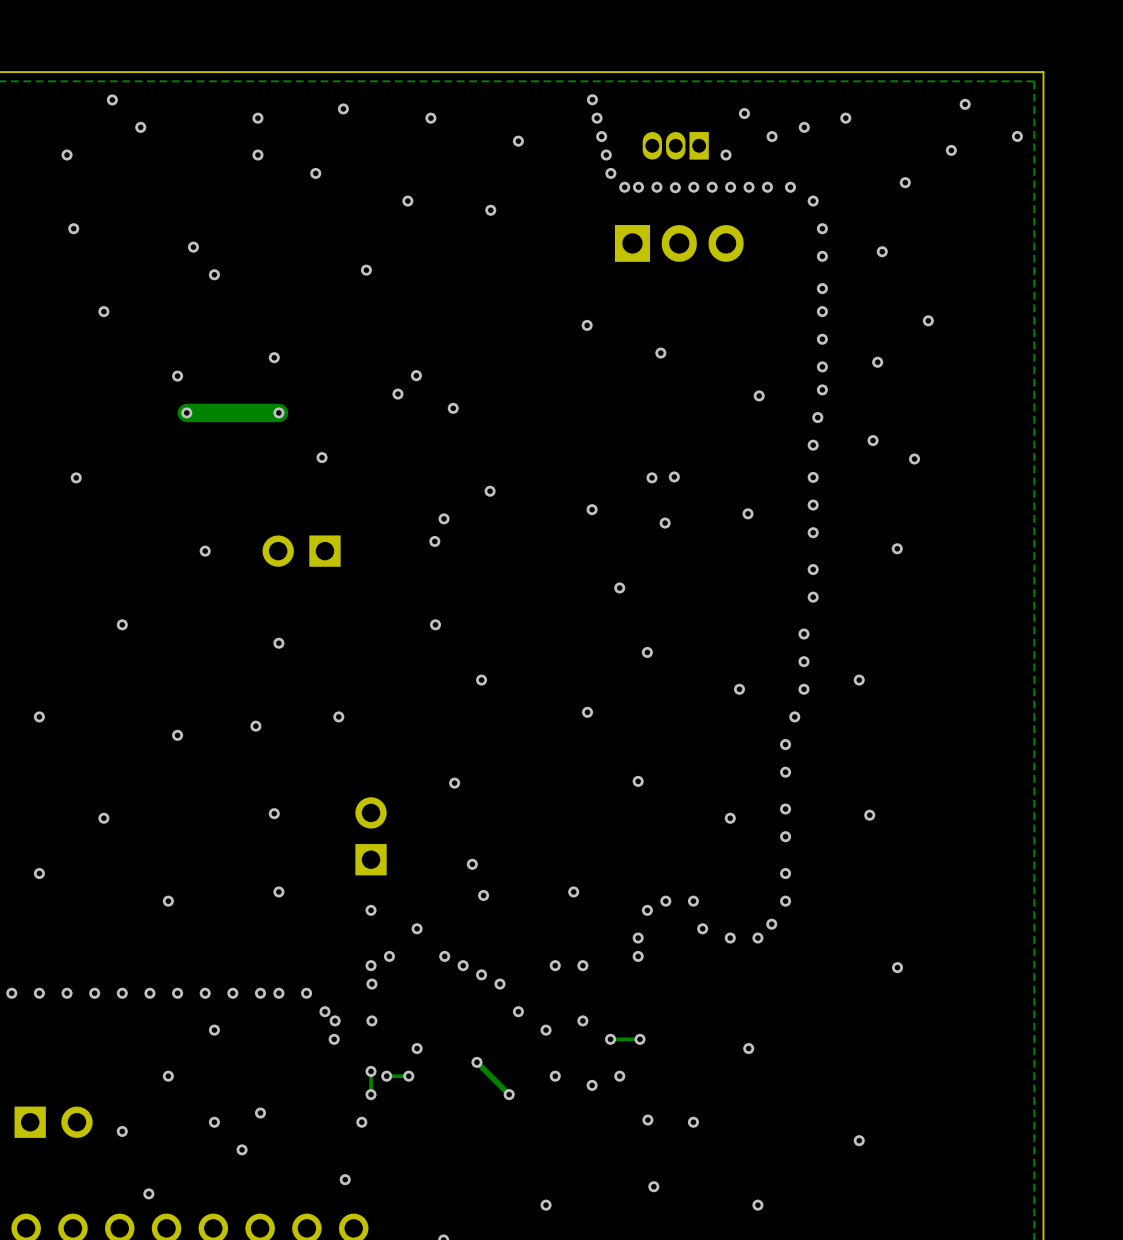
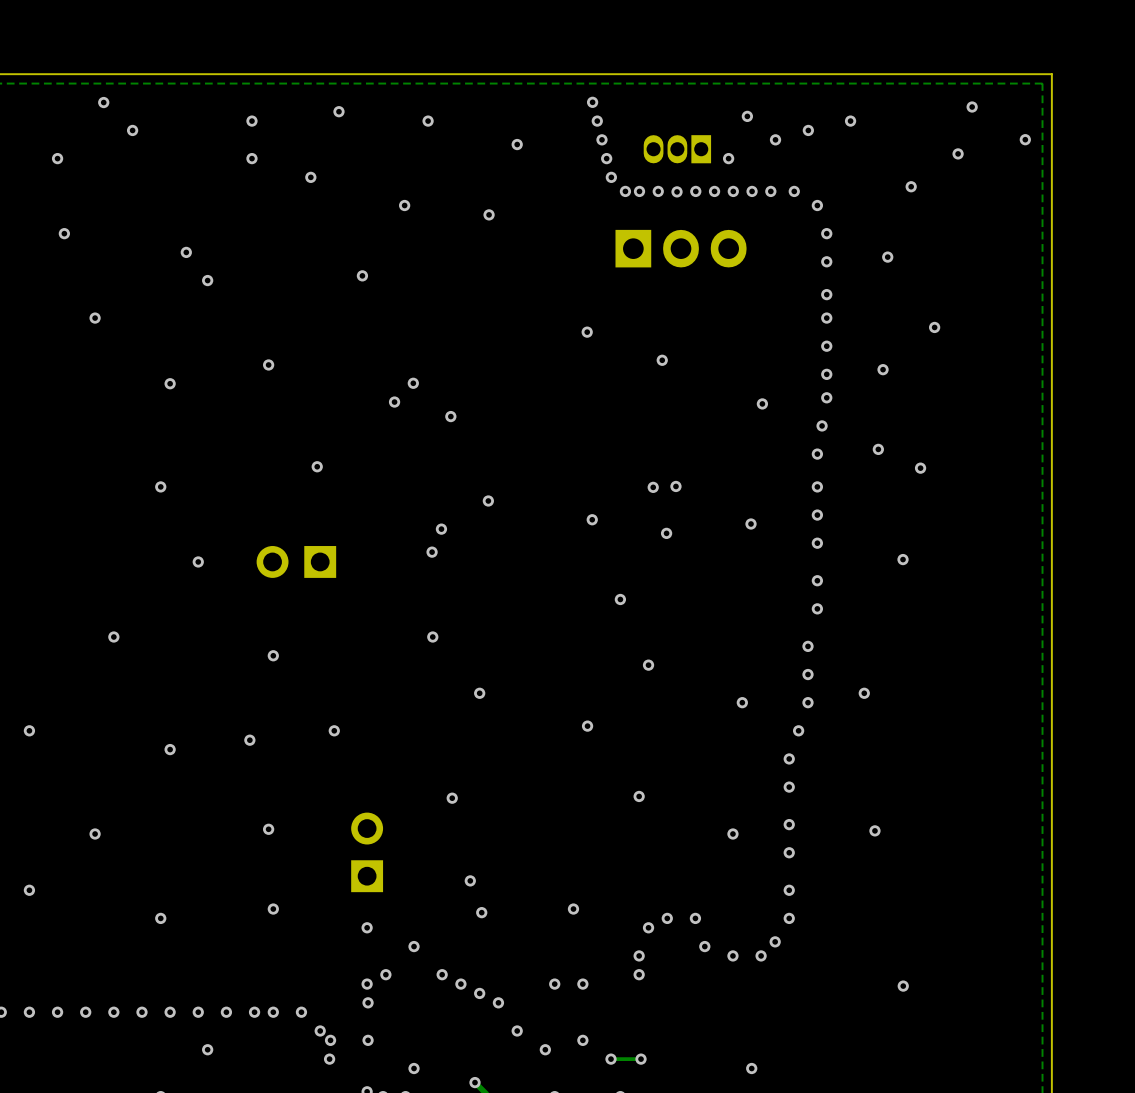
via: (186, 412) -> none
track: (278, 412) (186, 412) -> none
via: (278, 412) -> none
via: (76, 477) -> none
via: none -> (160, 486)

